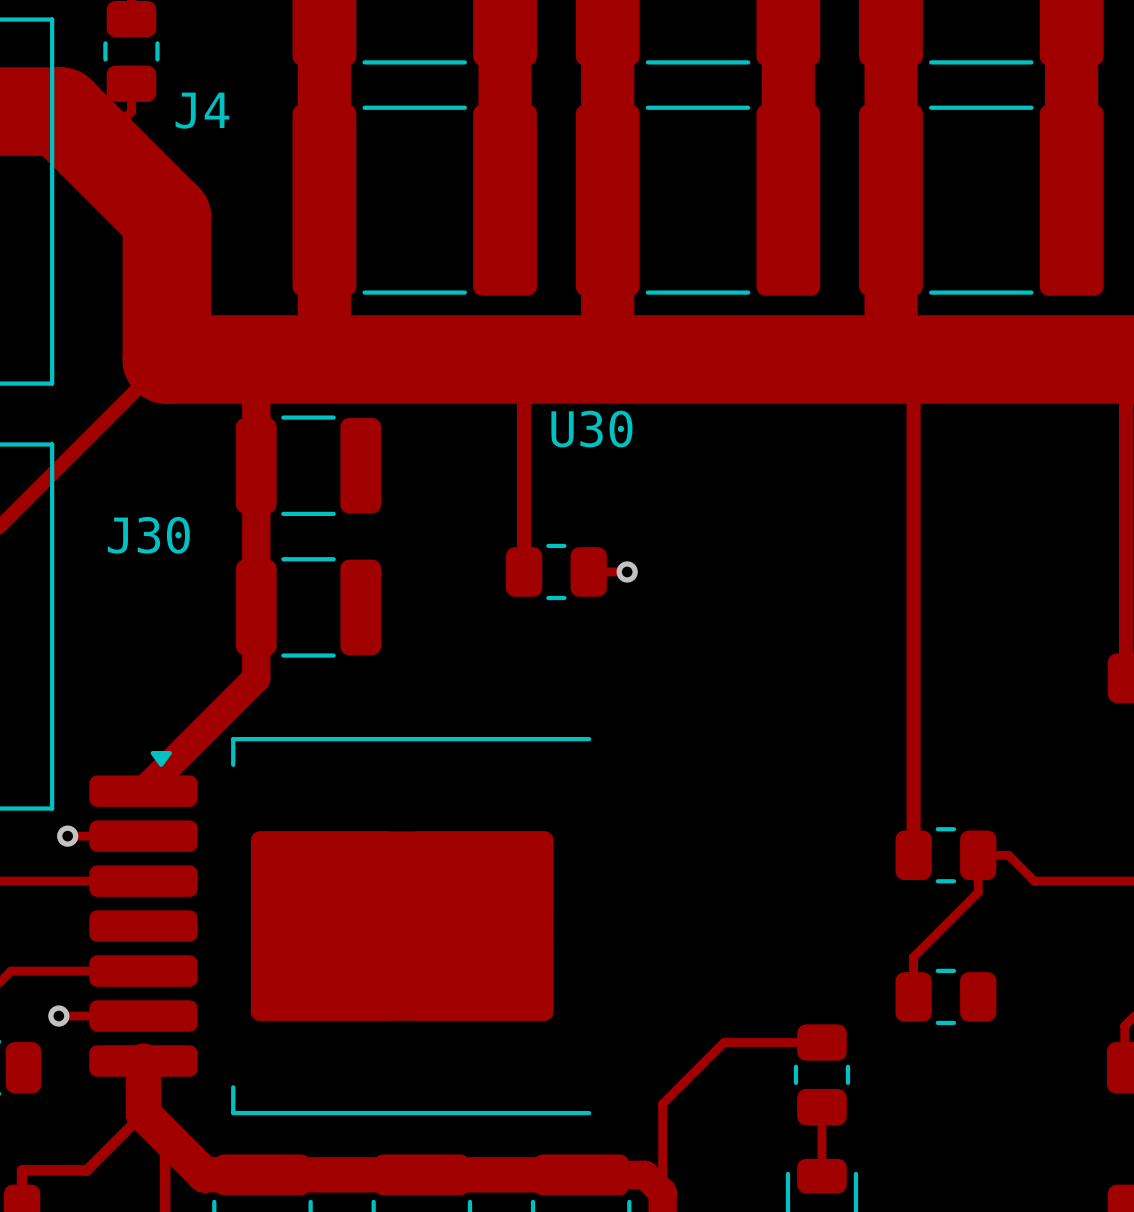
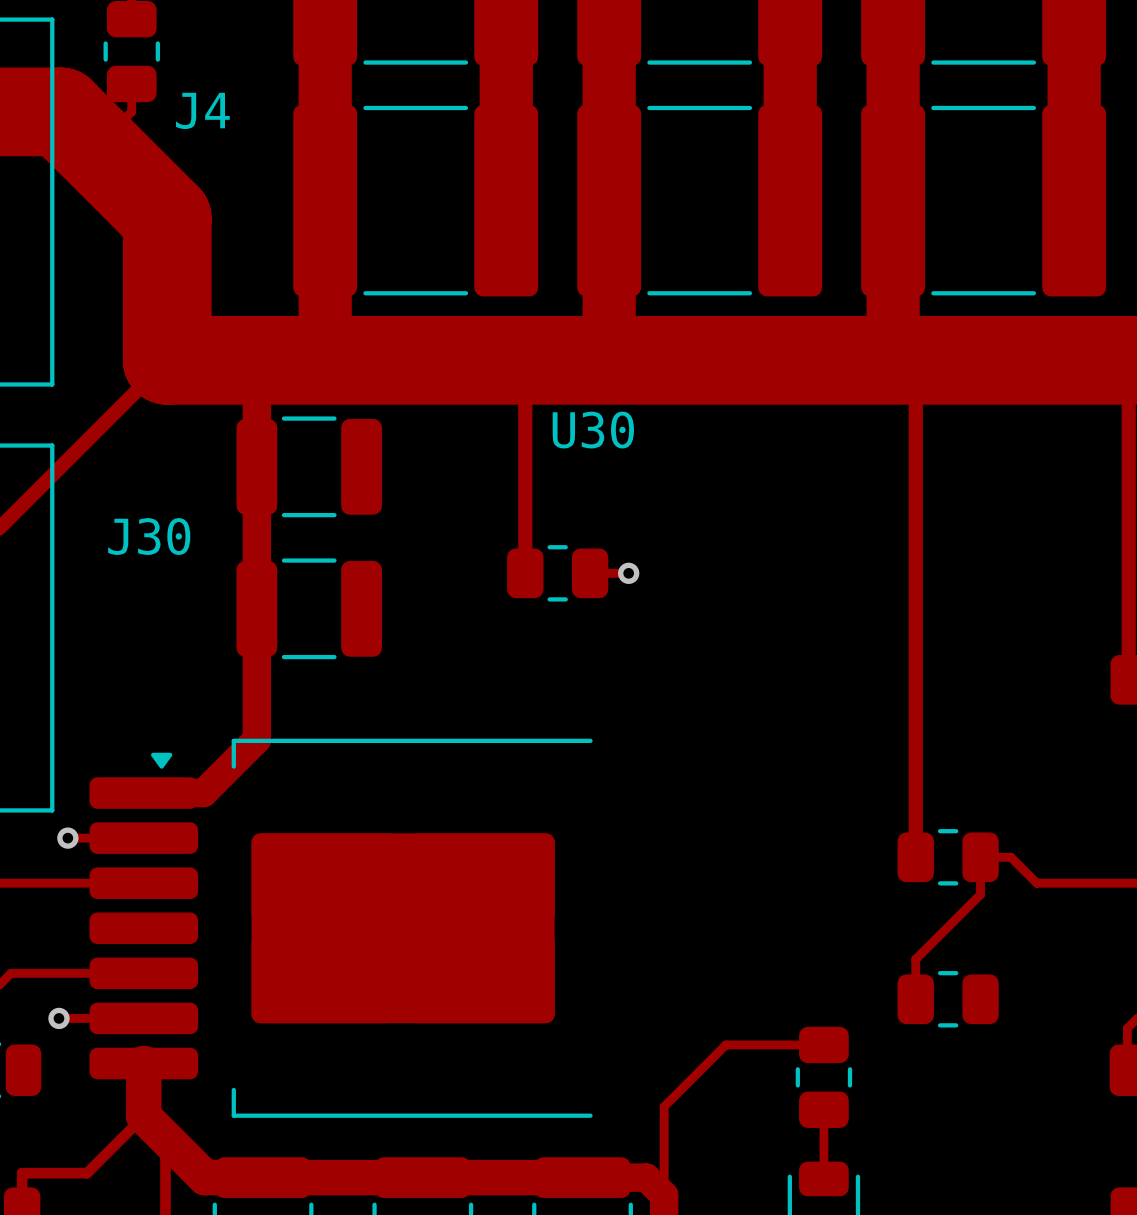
track: (256, 678) (143, 791) -> (256, 679) (256, 739) (203, 793) (143, 793)

